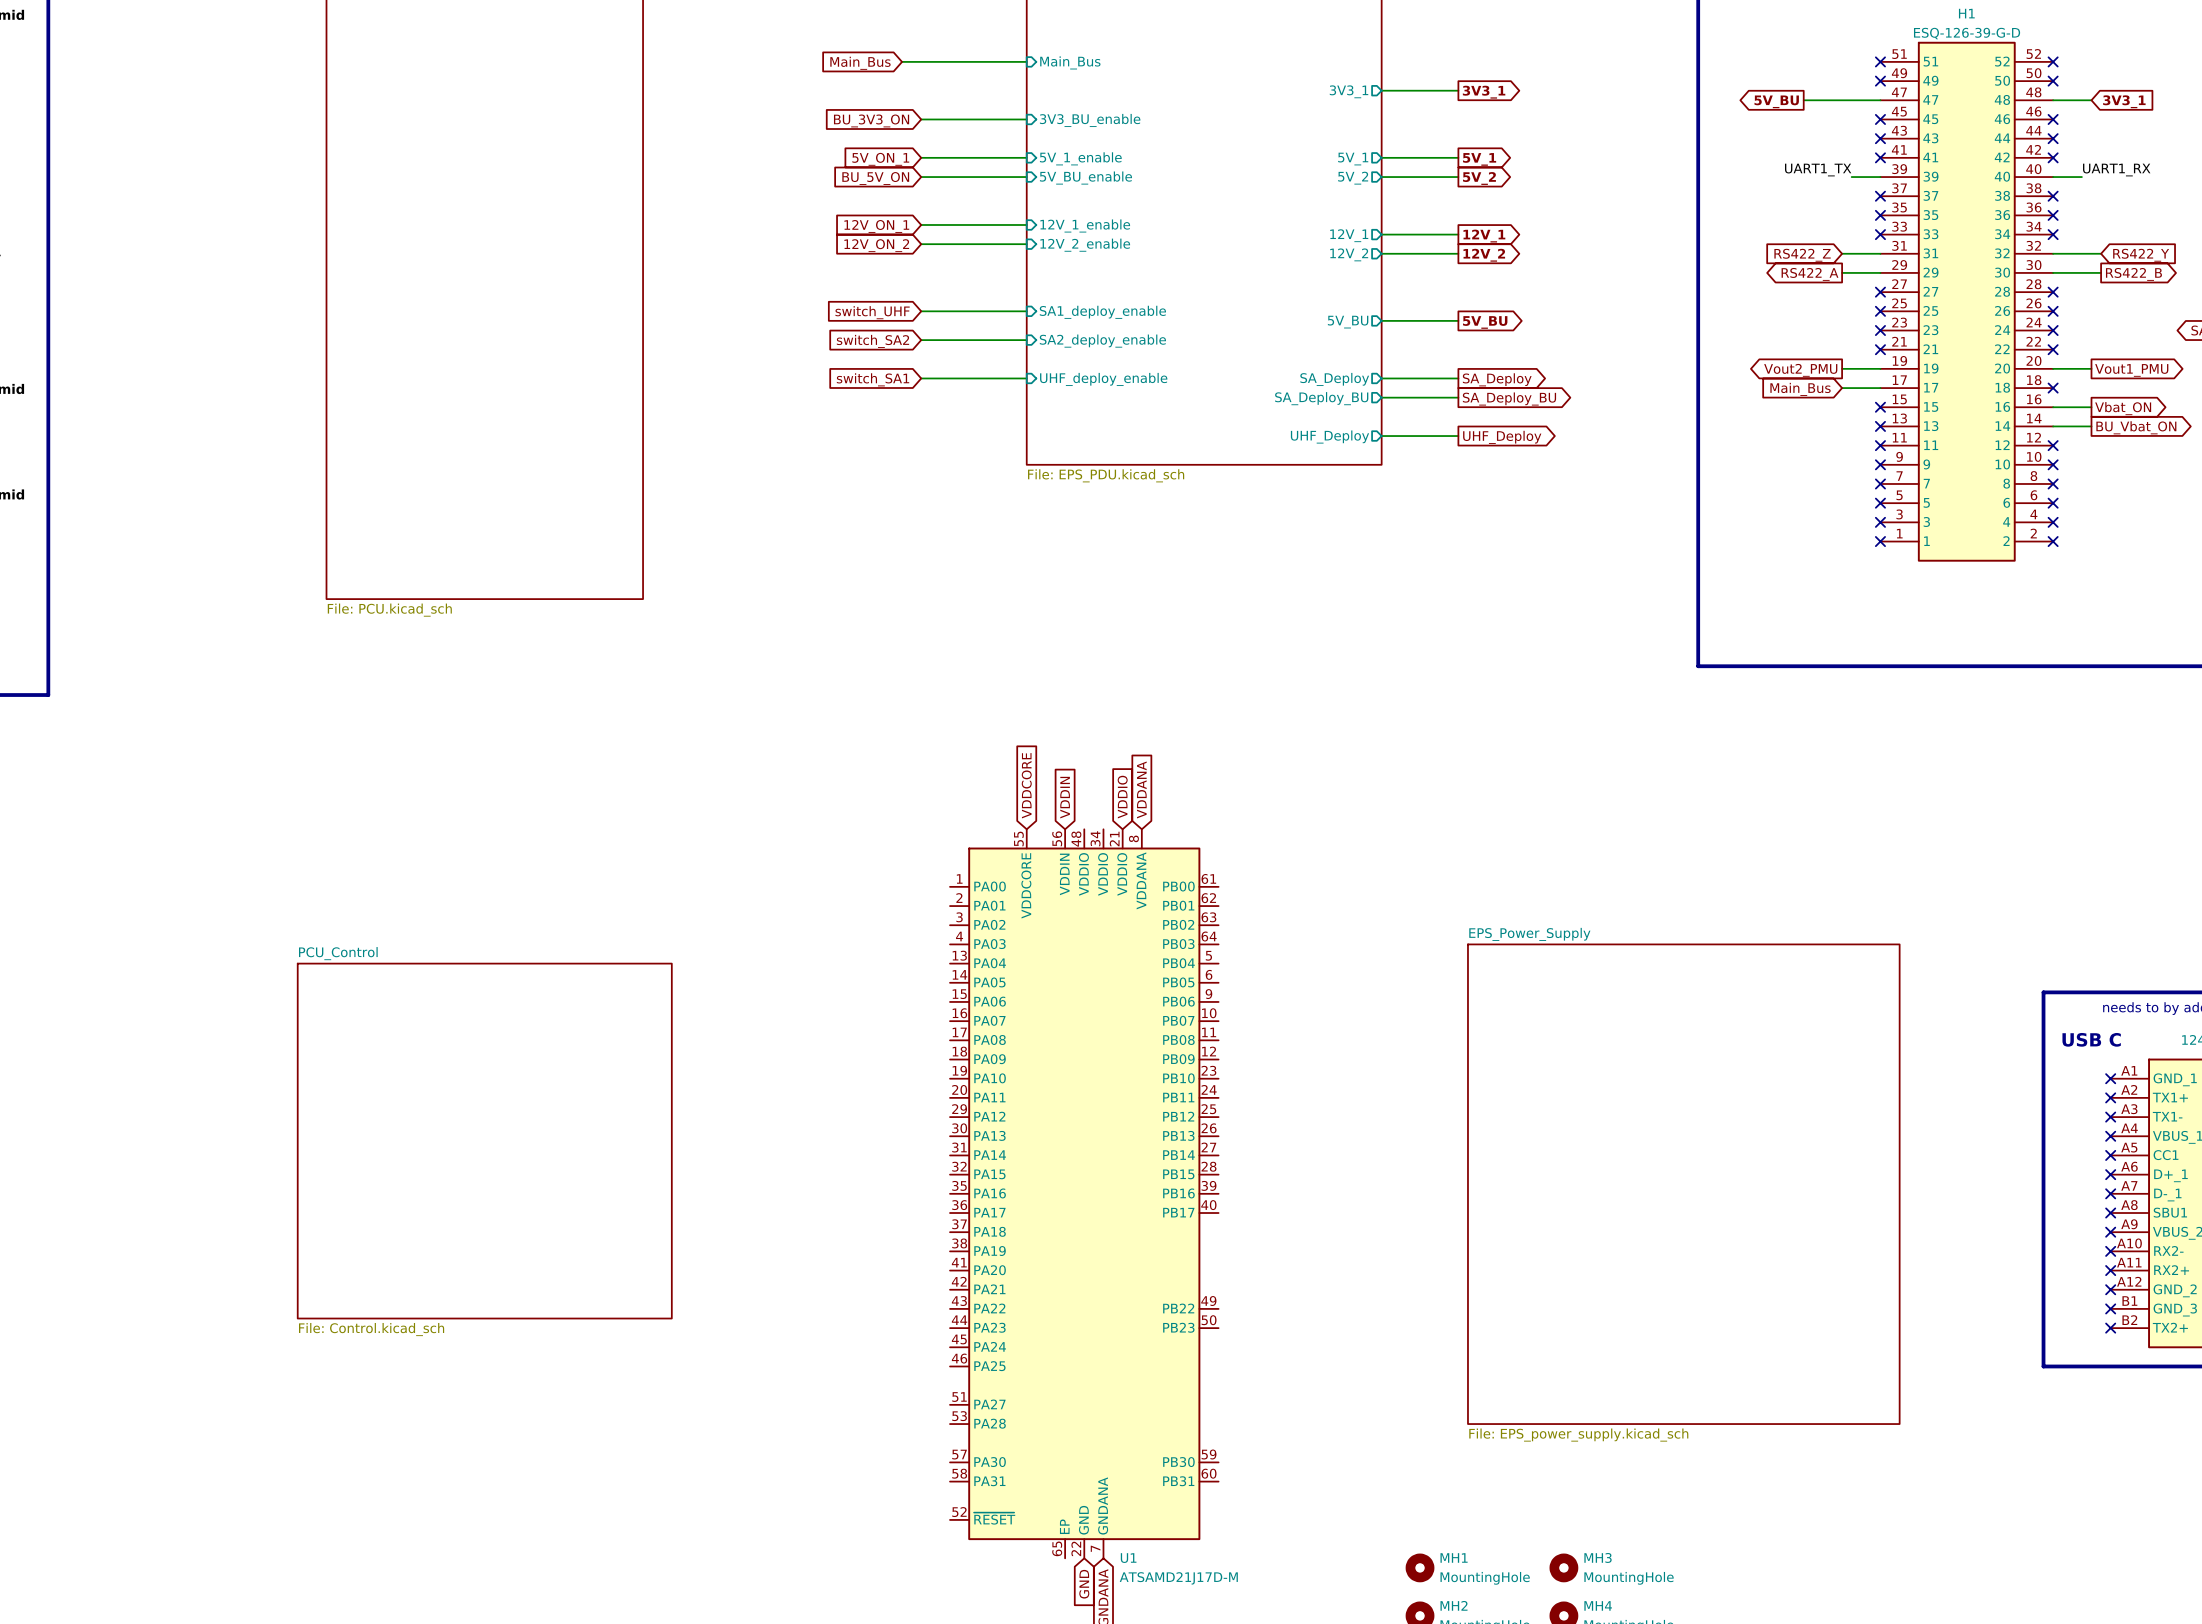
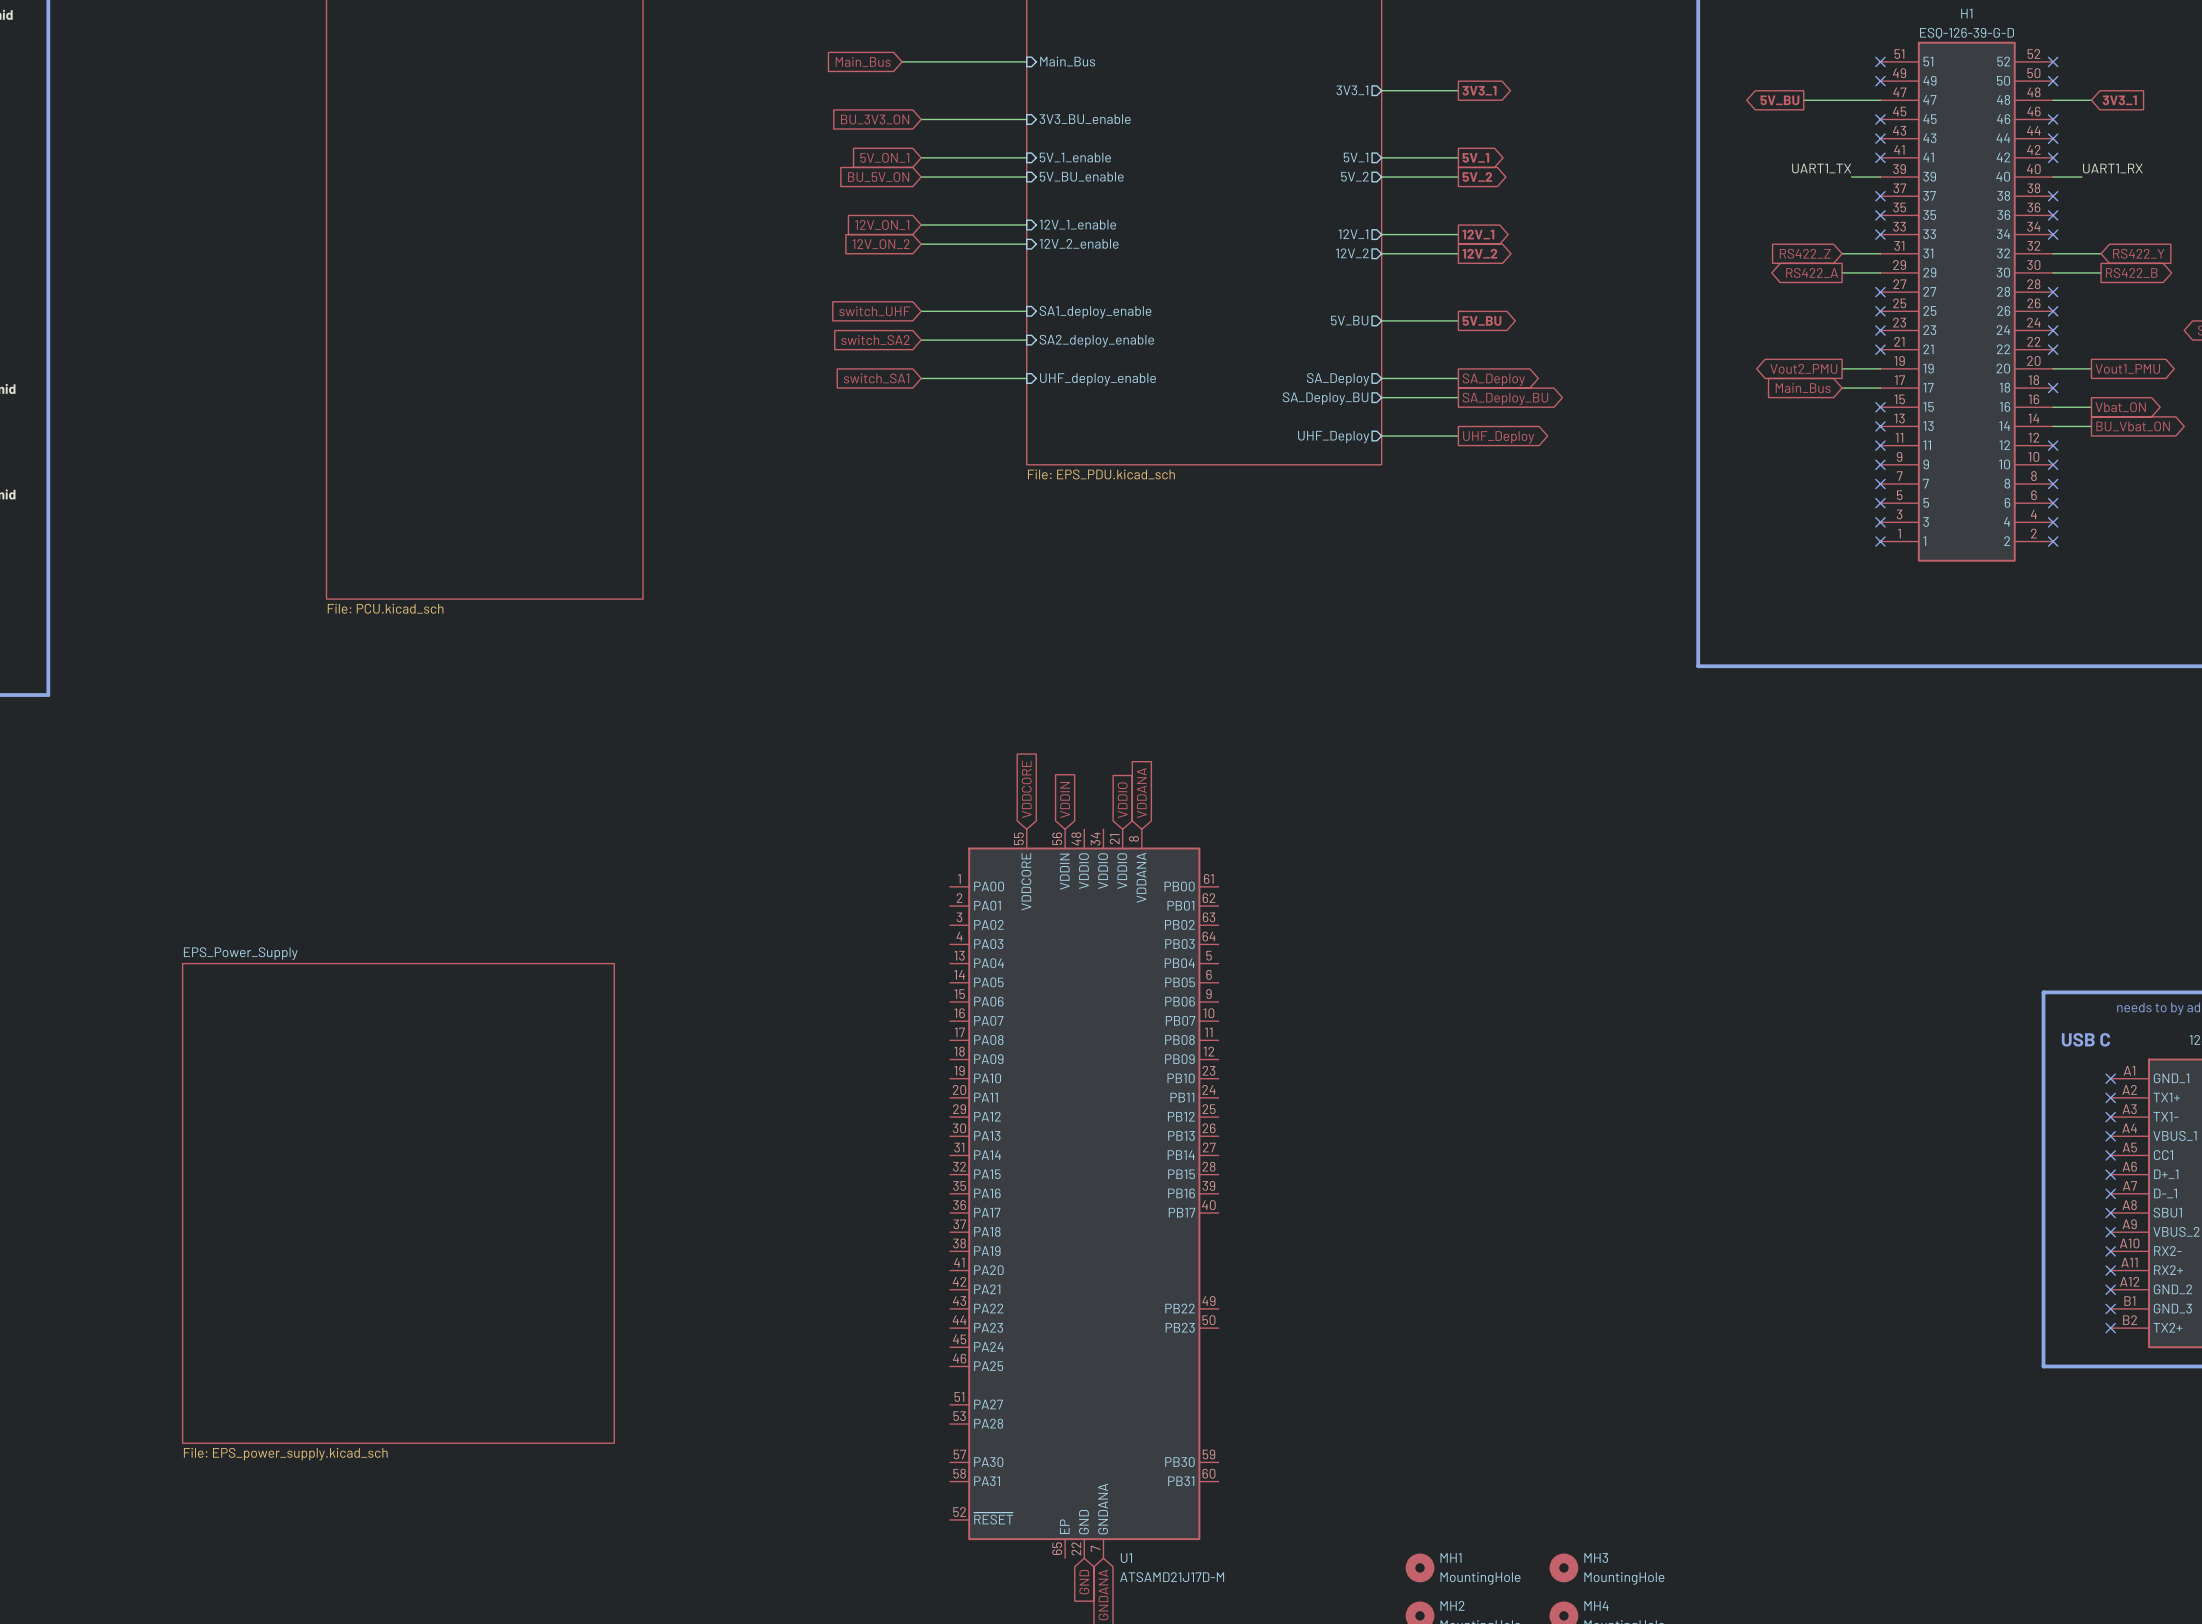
sheet PCU_Control: File: Control.kicad_sch (484, 1141) -> none
sheet EPS_Power_Supply: File: EPS_power_supply.kicad_sch (1683, 1184) -> none
sheet EPS_Power_Supply: none -> File: EPS_power_supply.kicad_sch (398, 1203)

